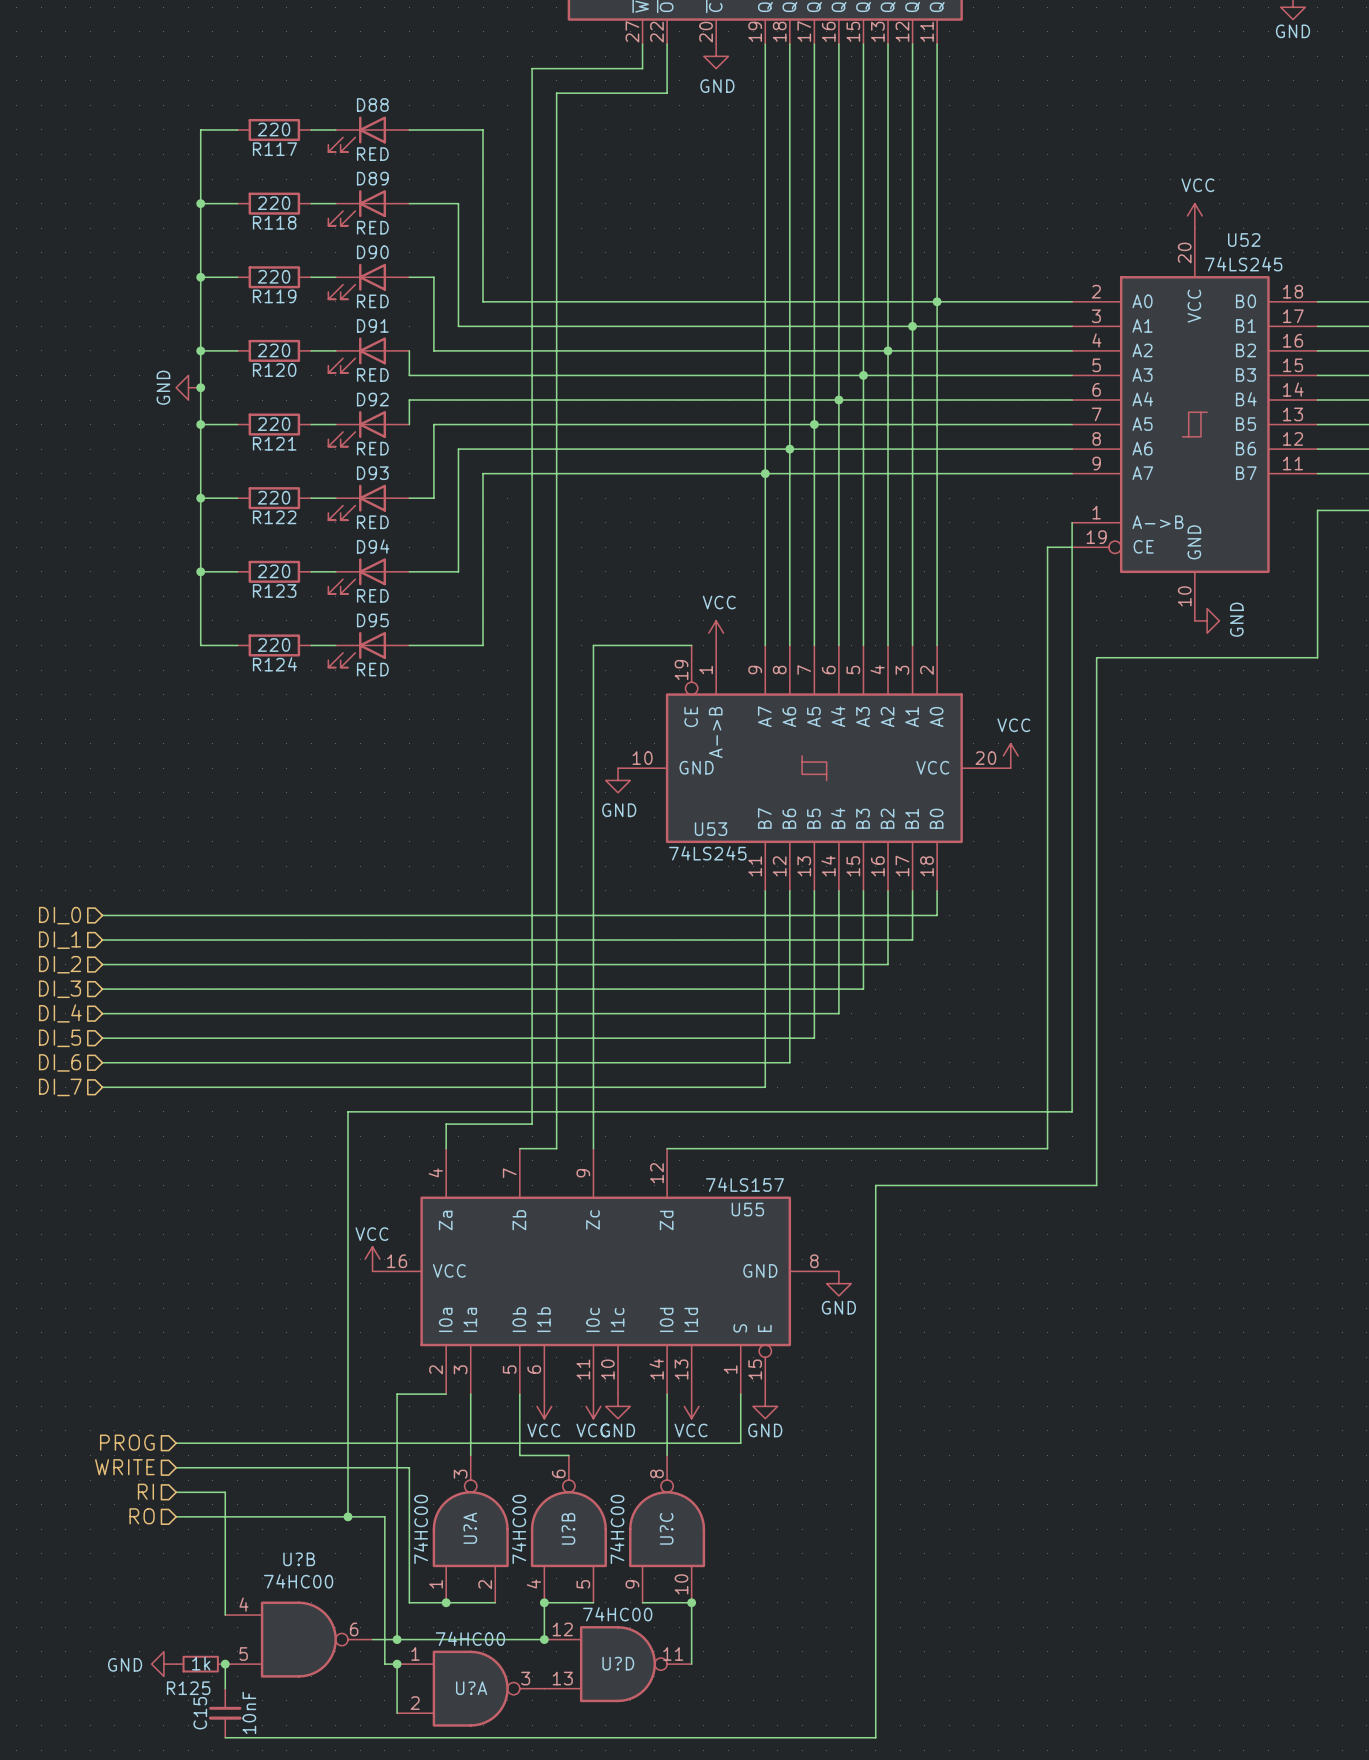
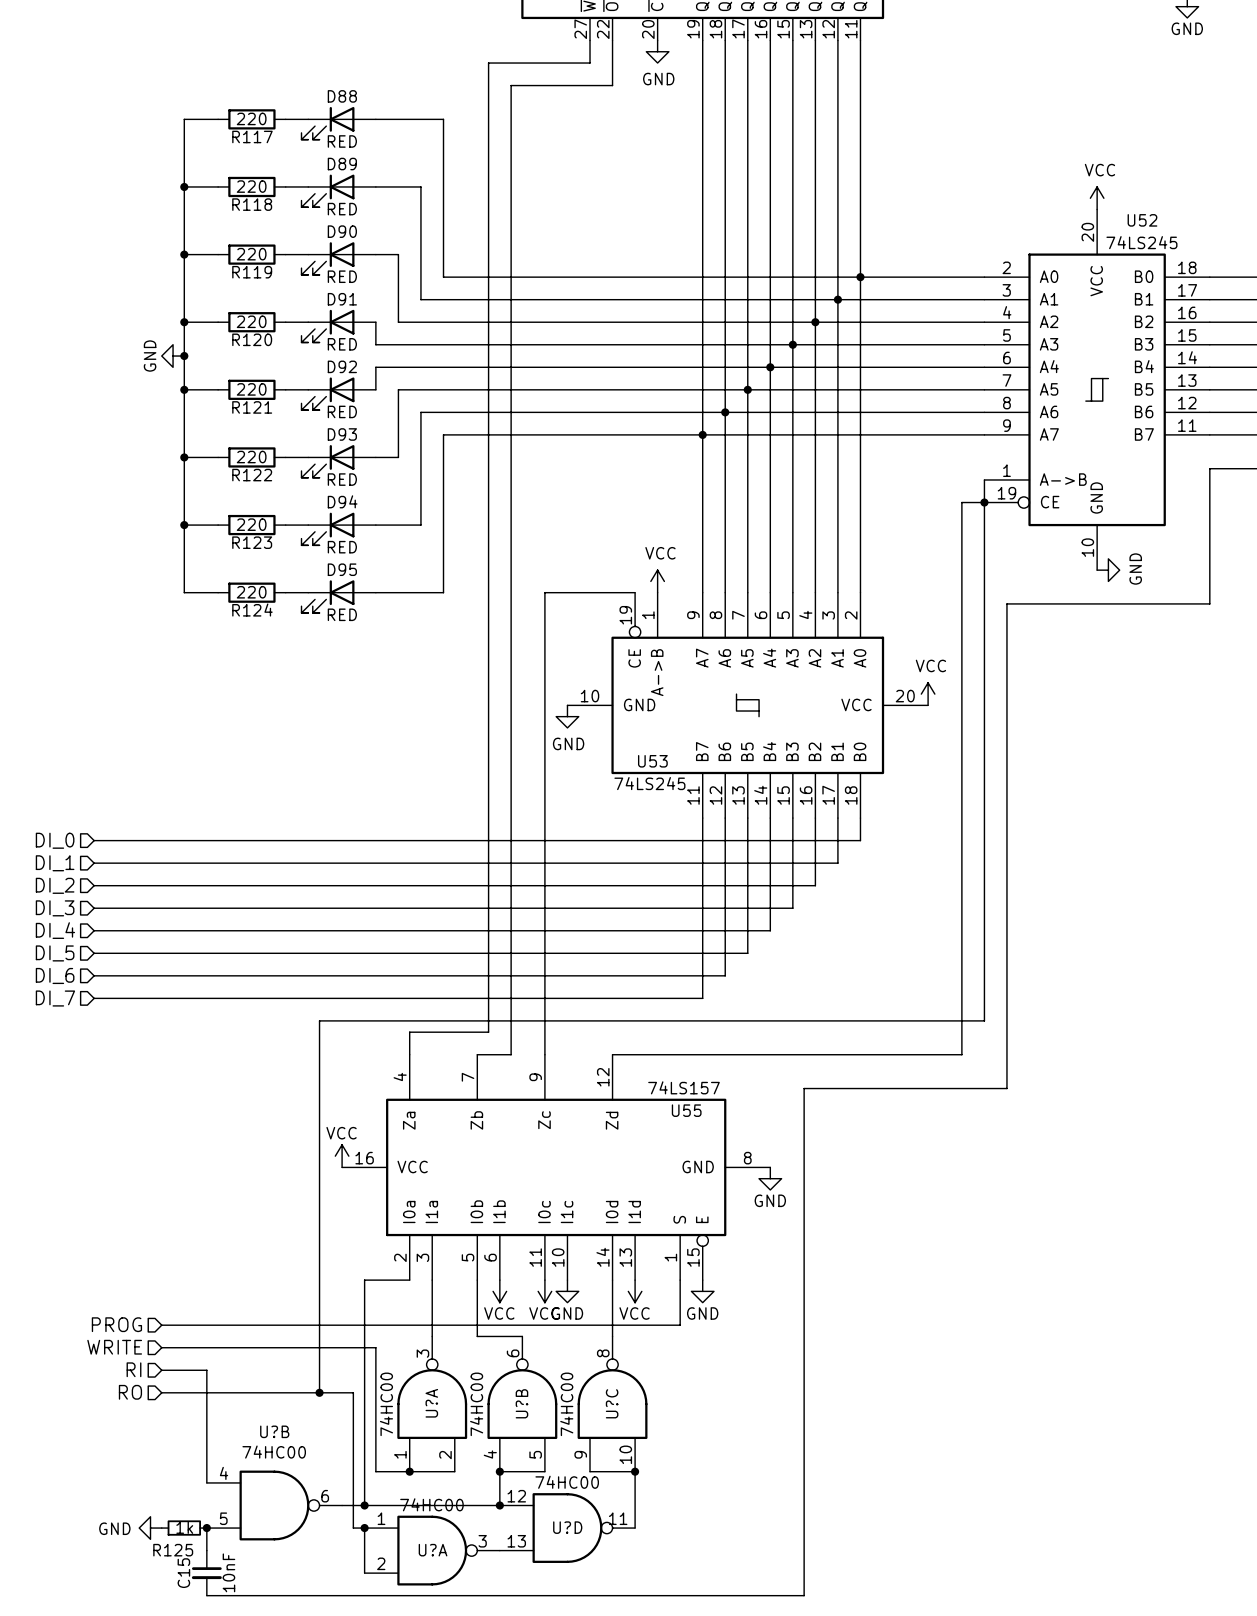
junction: none -> (984, 502)

